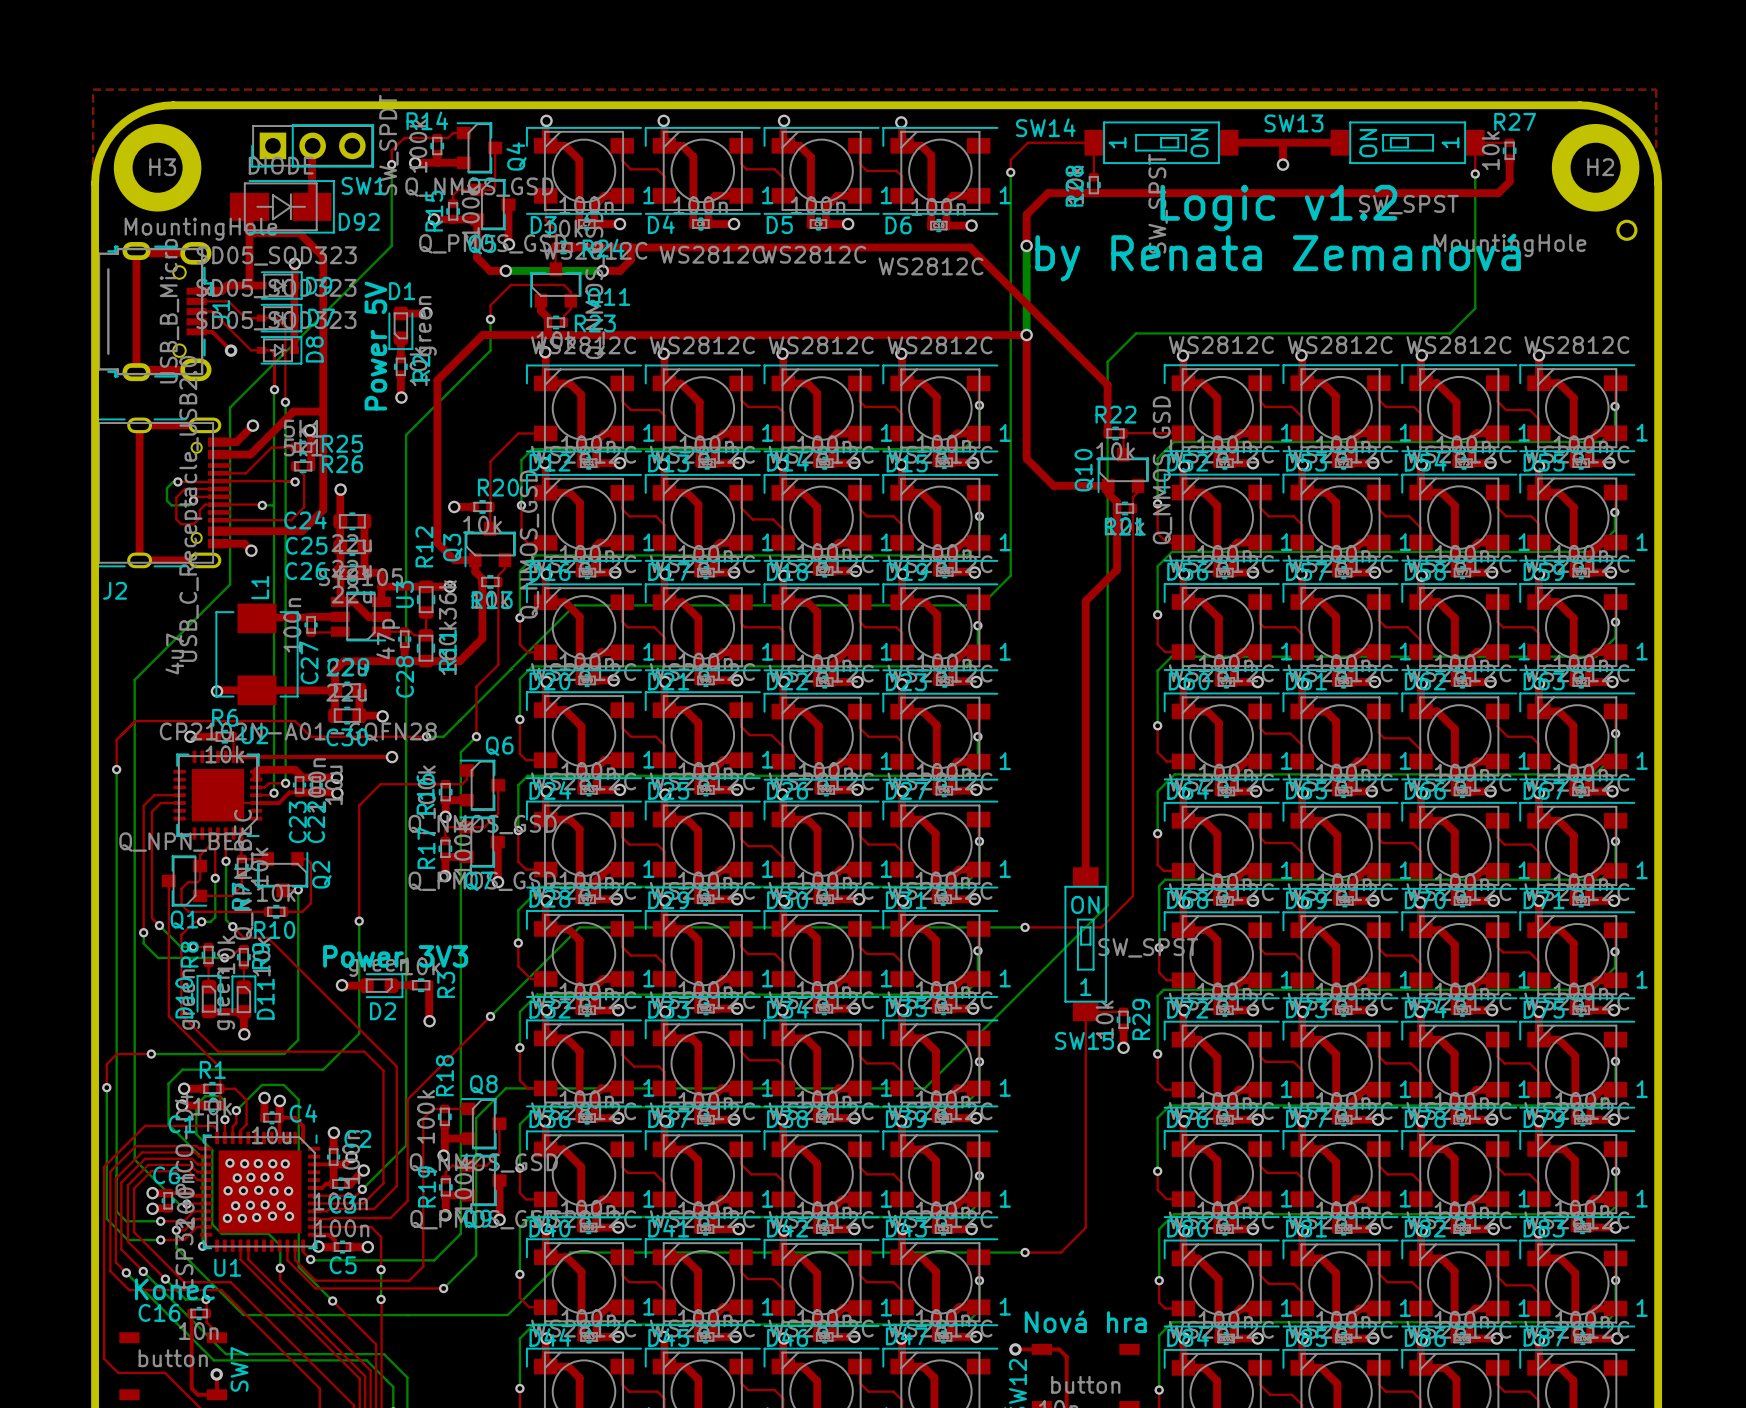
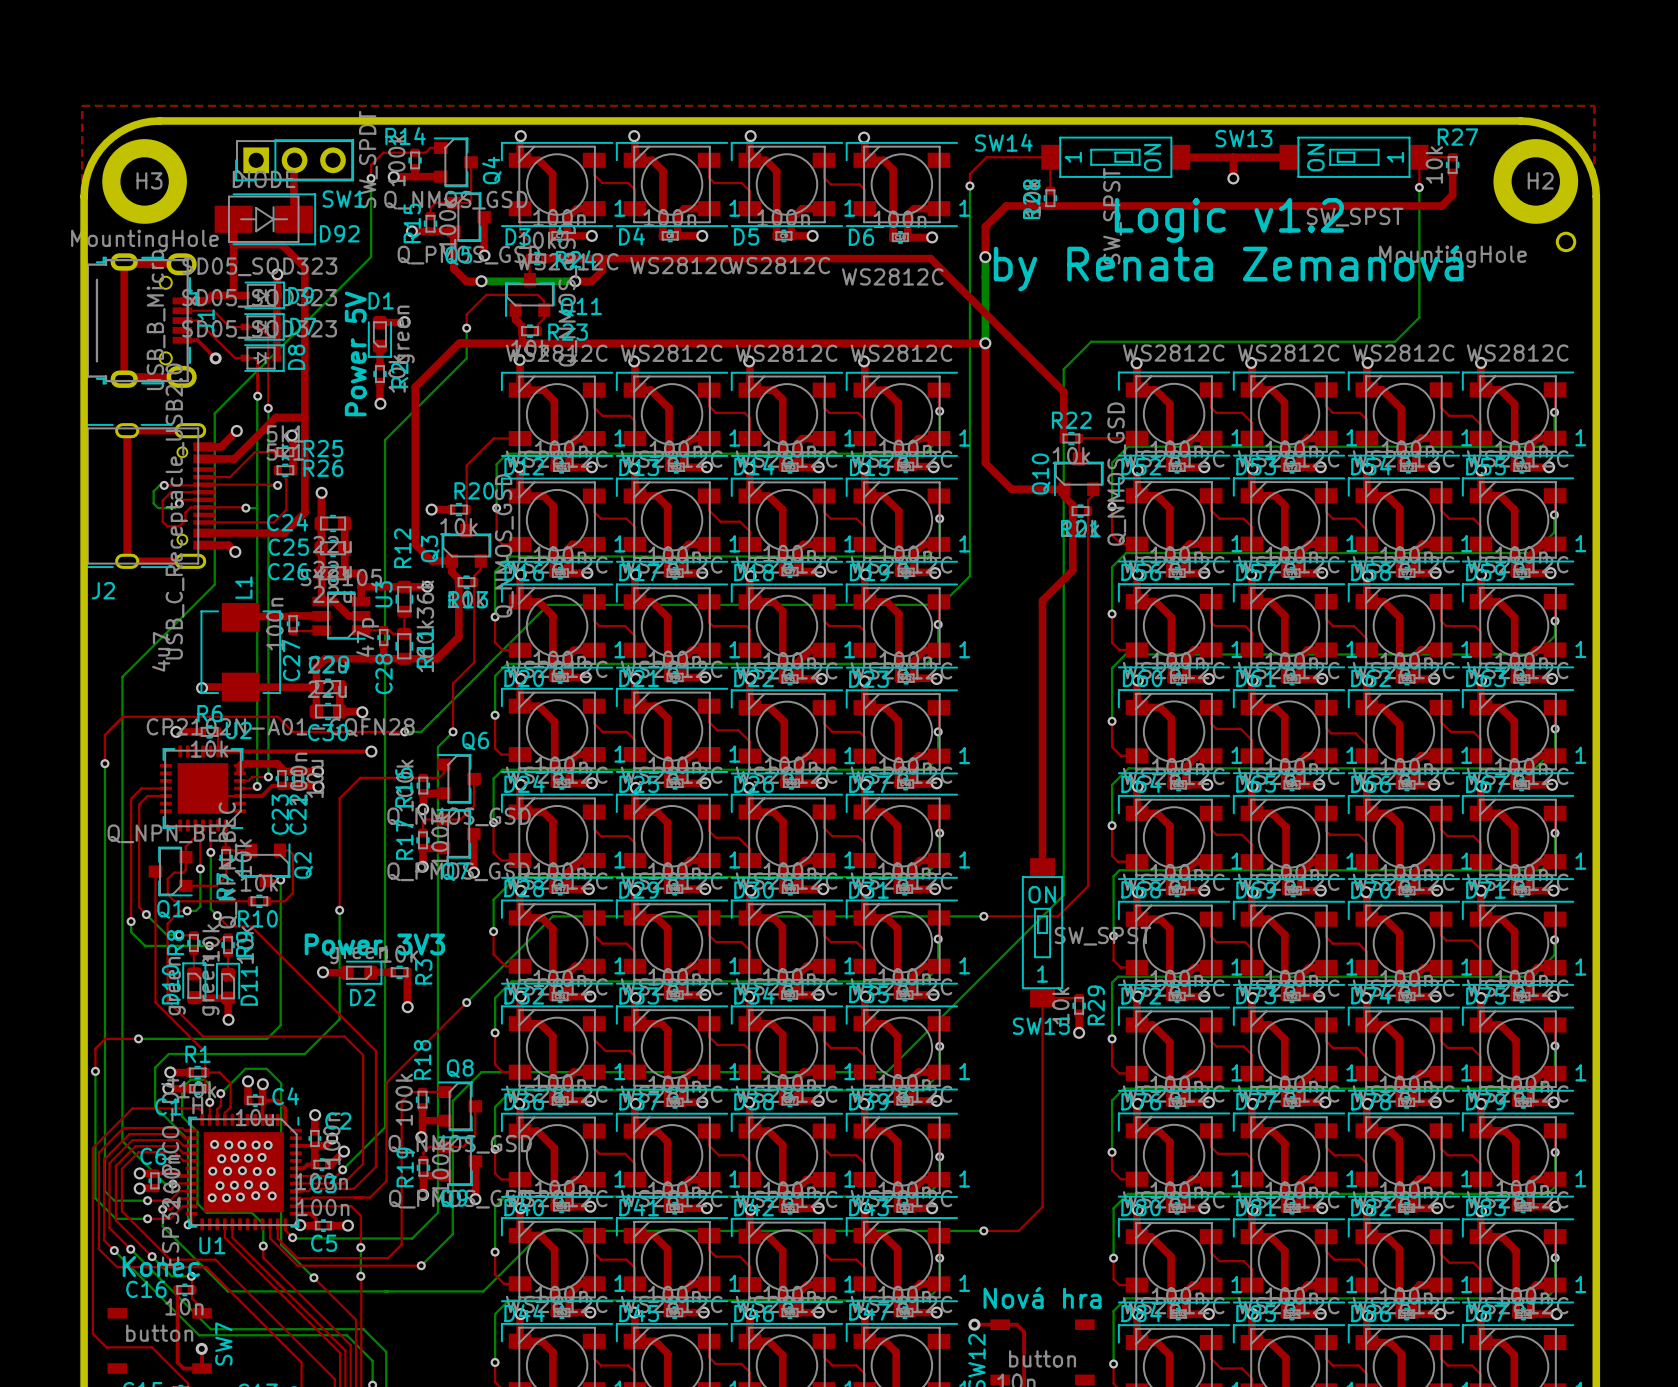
H3 value position: MountingHole (200, 229) -> MountingHole (144, 240)

